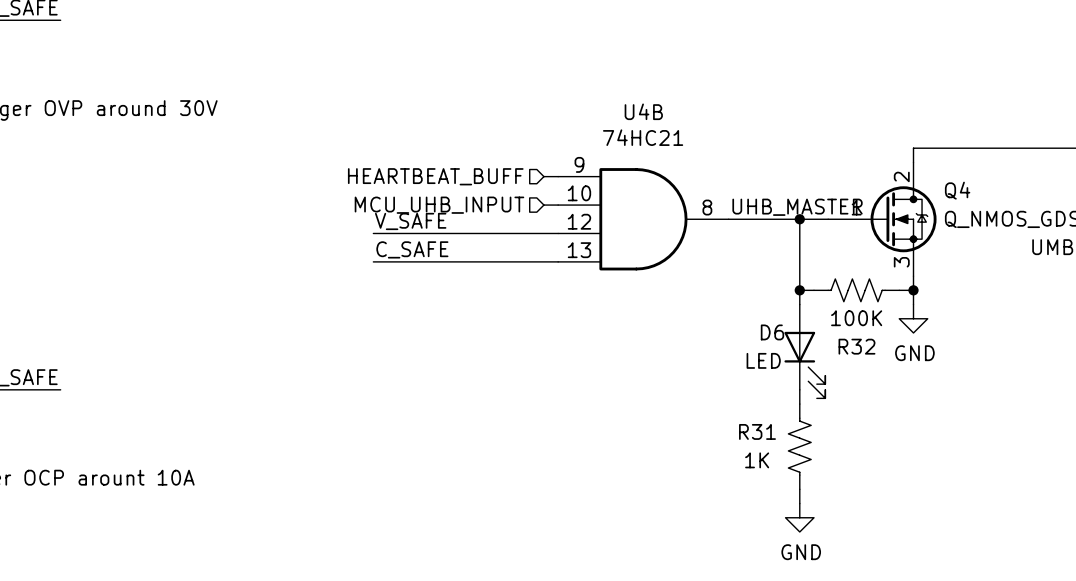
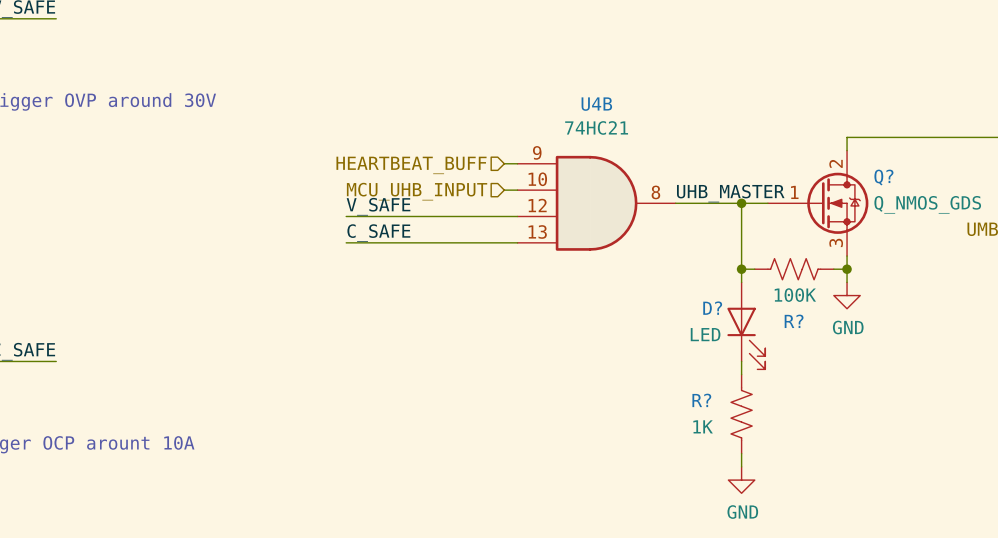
Q4 name: Q4 (957, 190) -> Q? (883, 177)
D6 name: D6 (772, 332) -> D? (712, 308)
R32 name: R32 (856, 346) -> R? (794, 321)
R31 name: R31 (757, 431) -> R? (701, 400)

